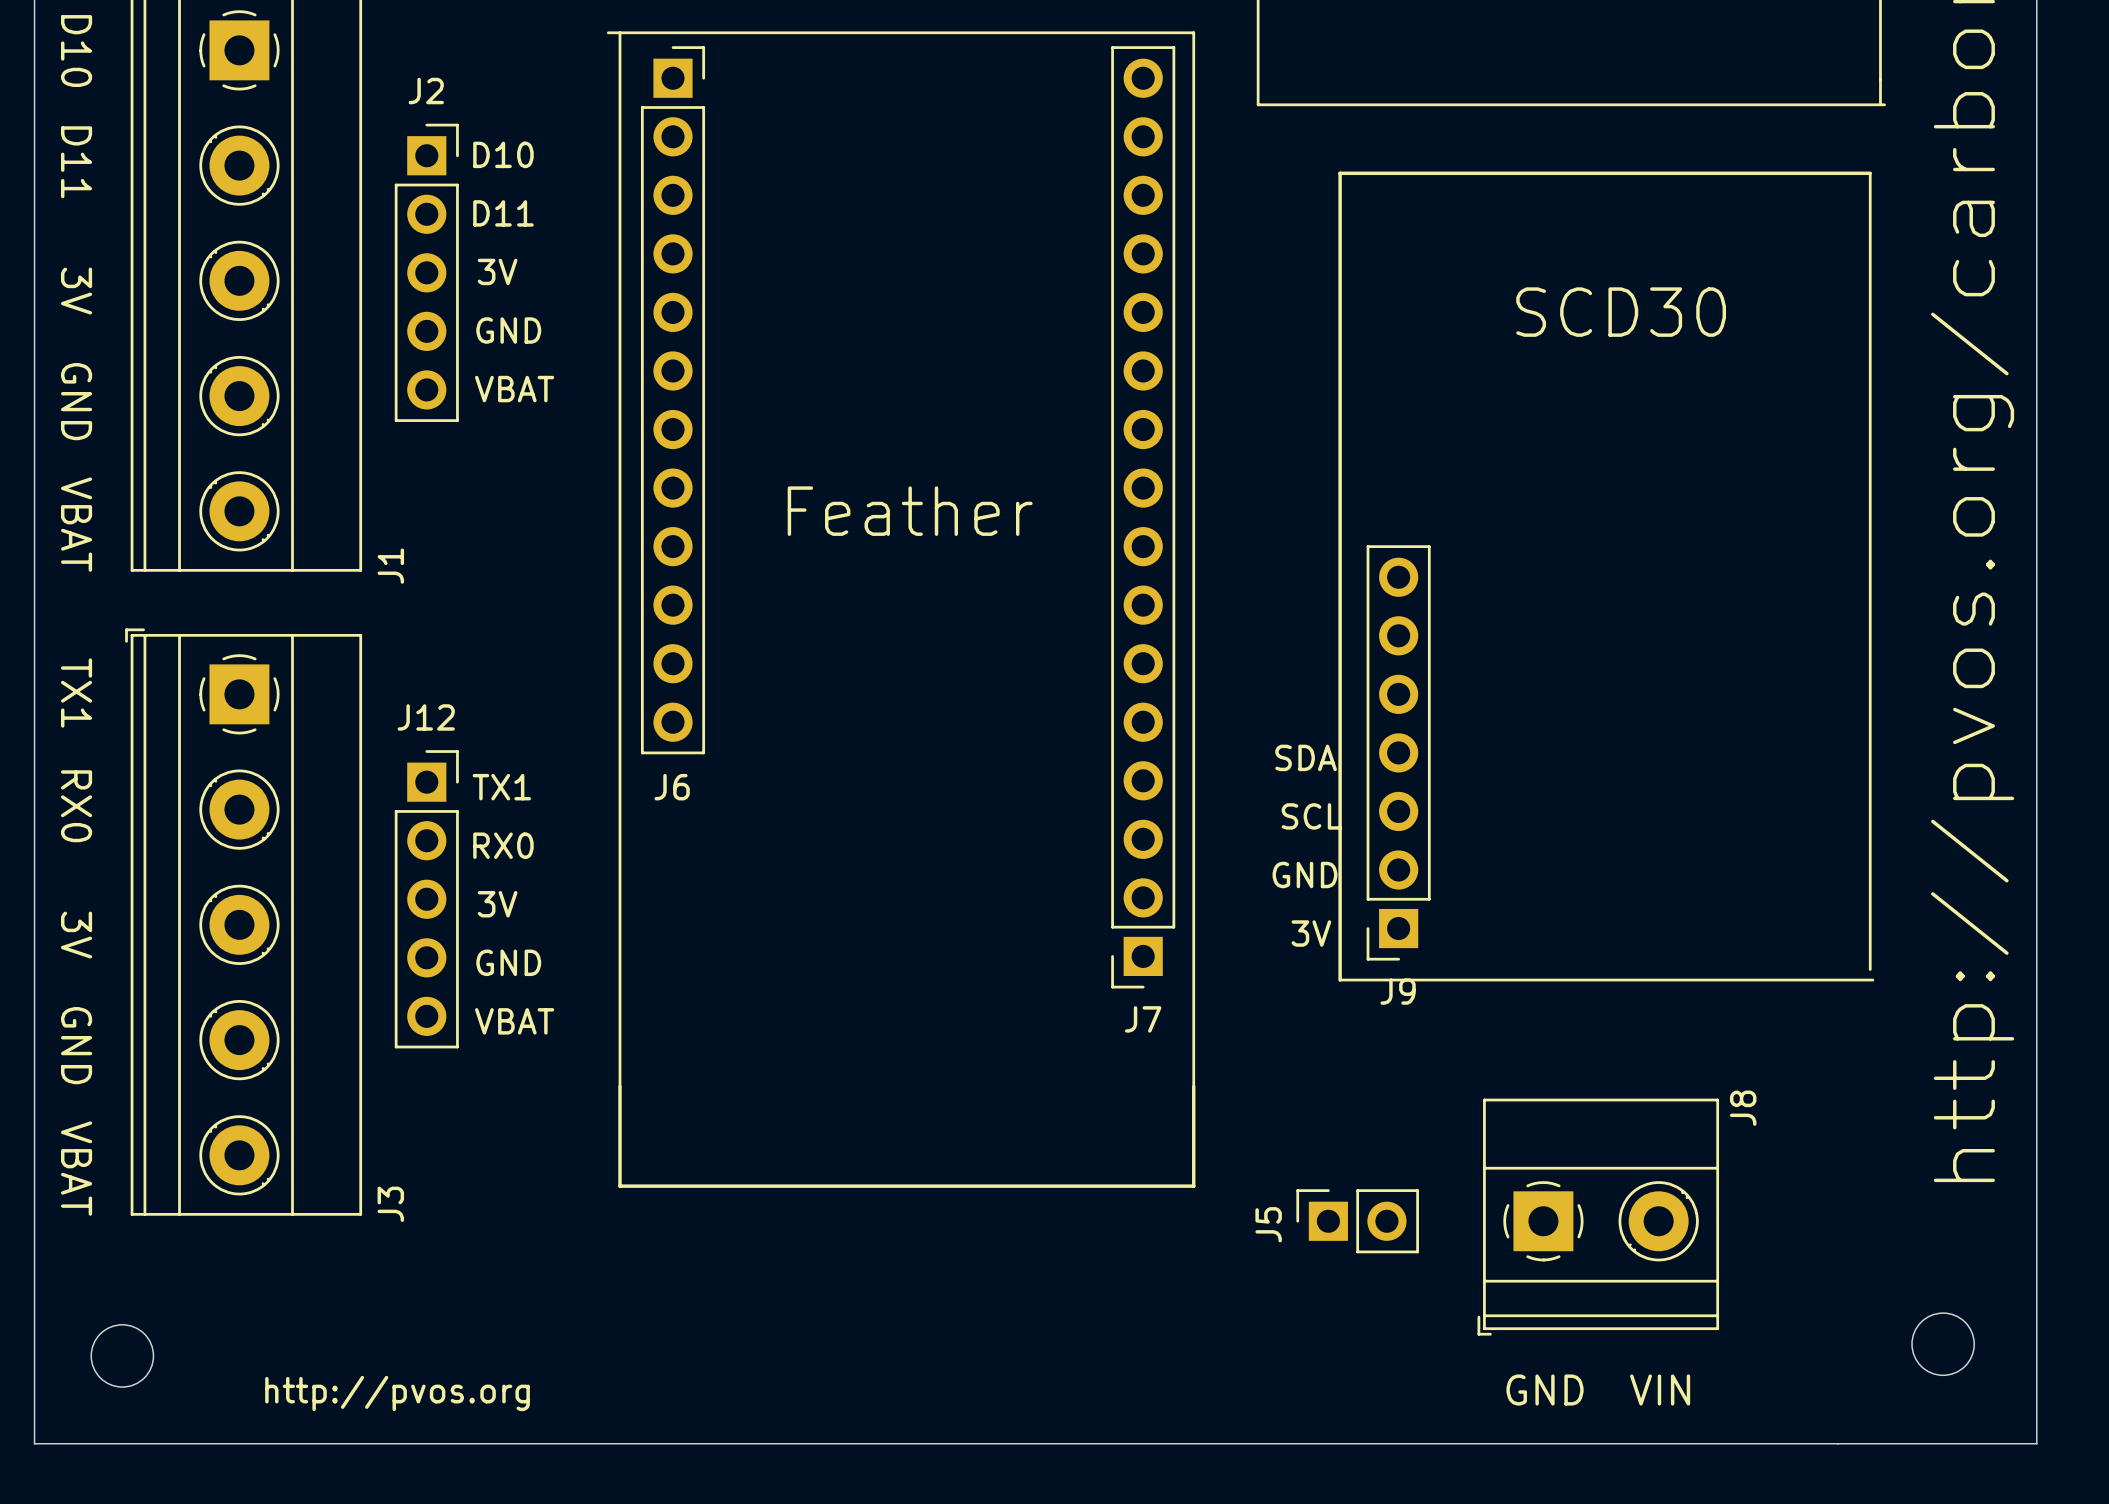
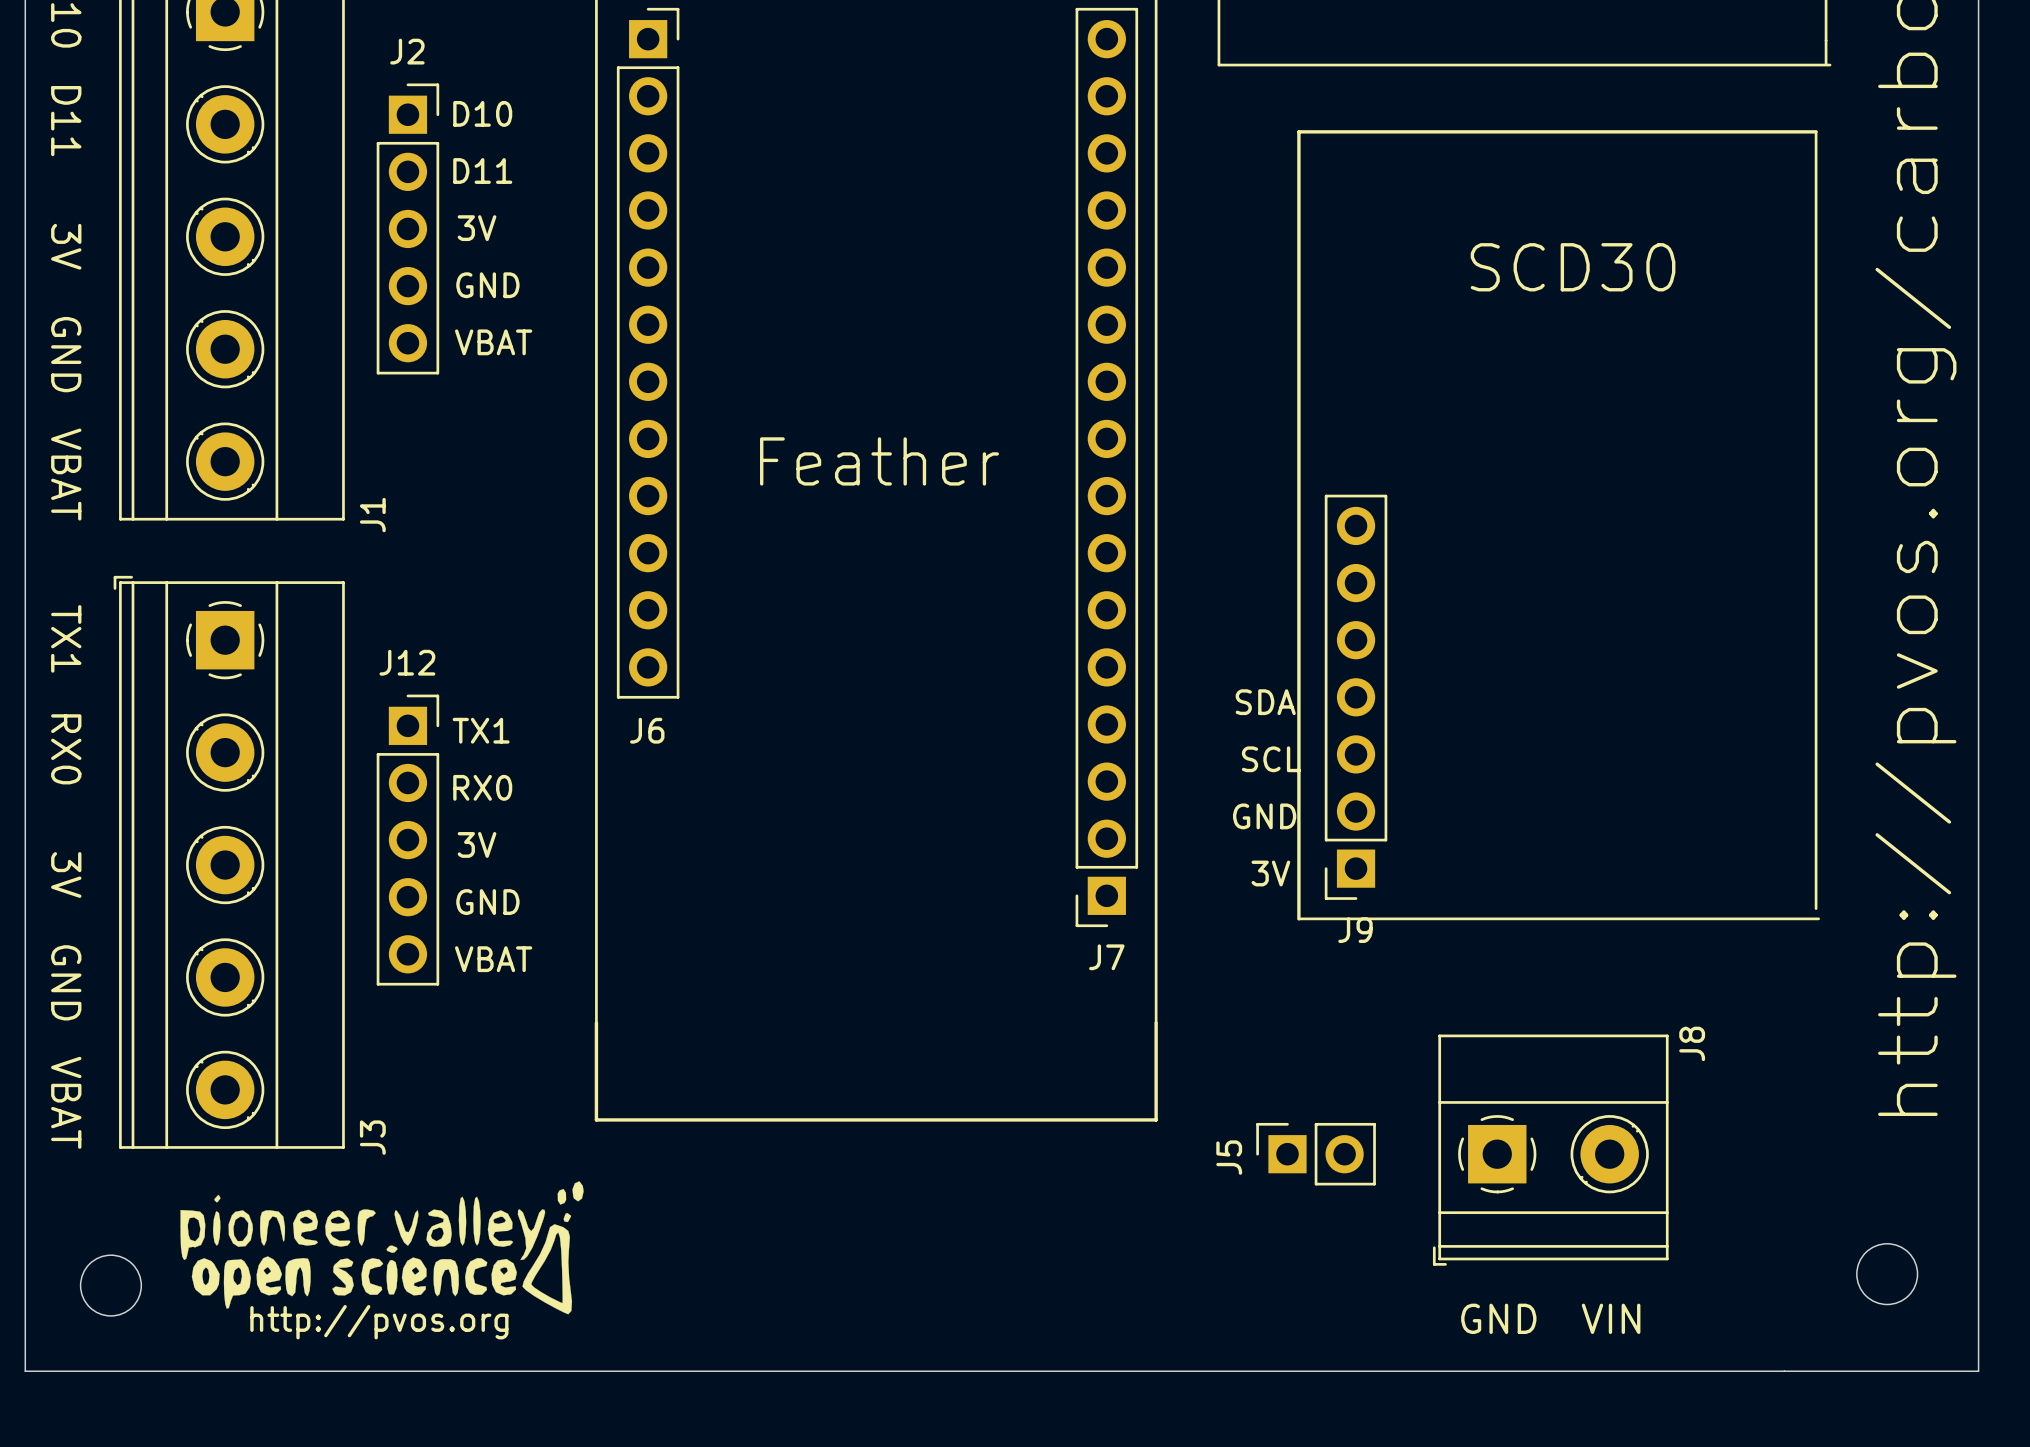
drawing: none -> [180, 1181, 584, 1315]

